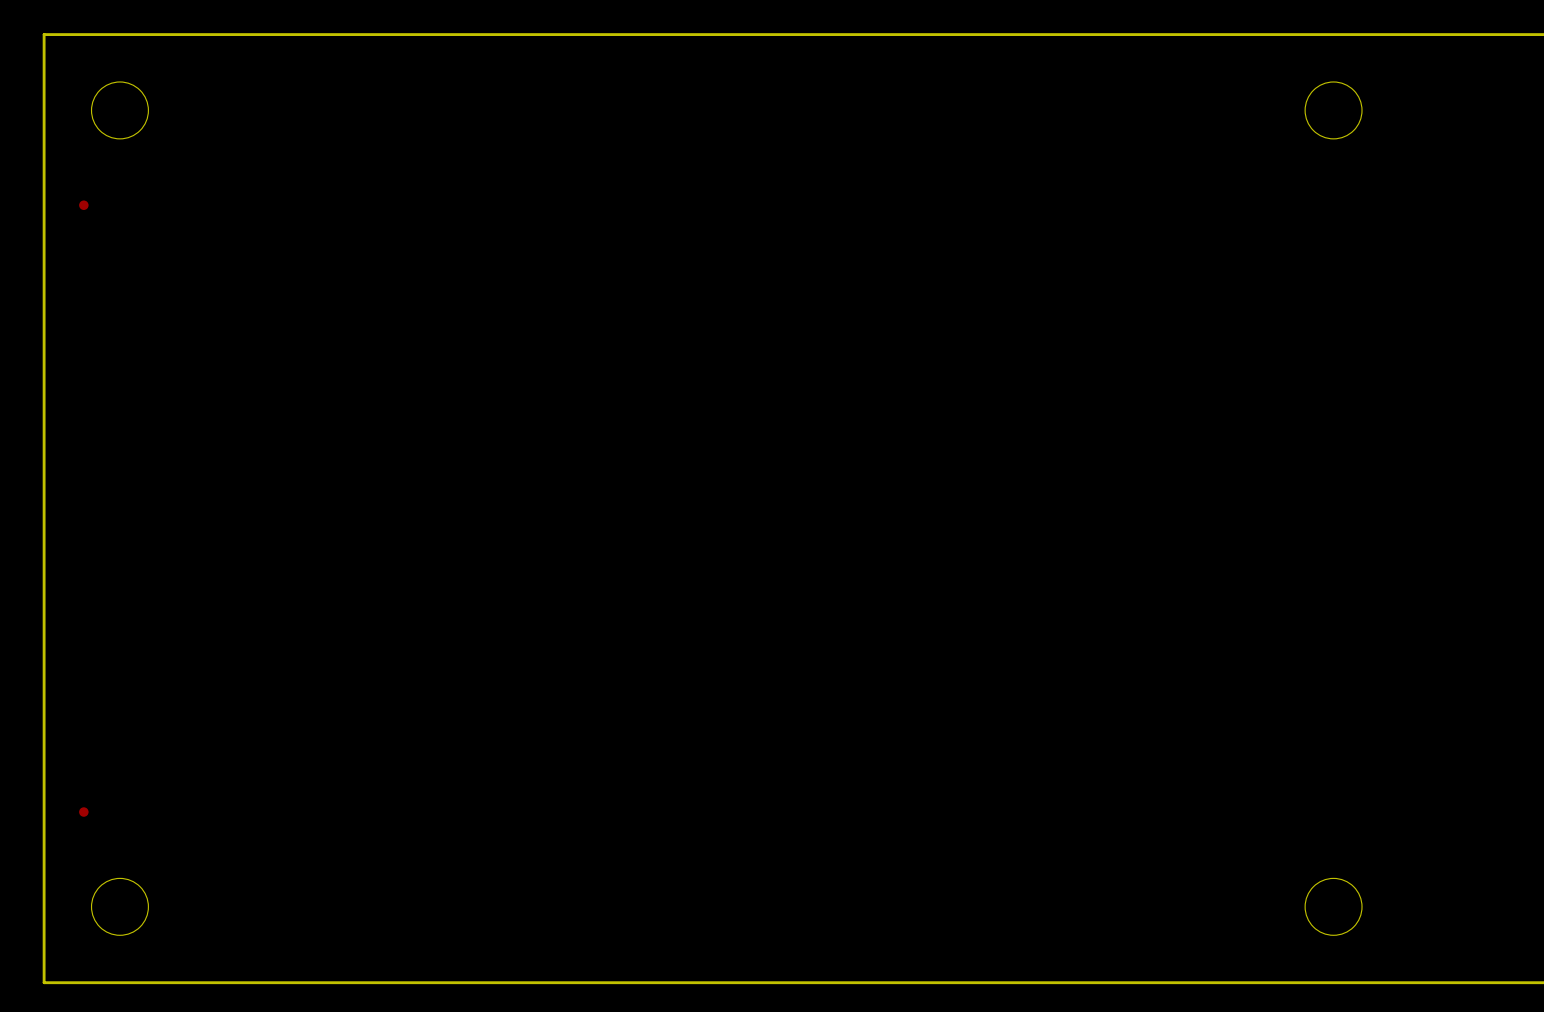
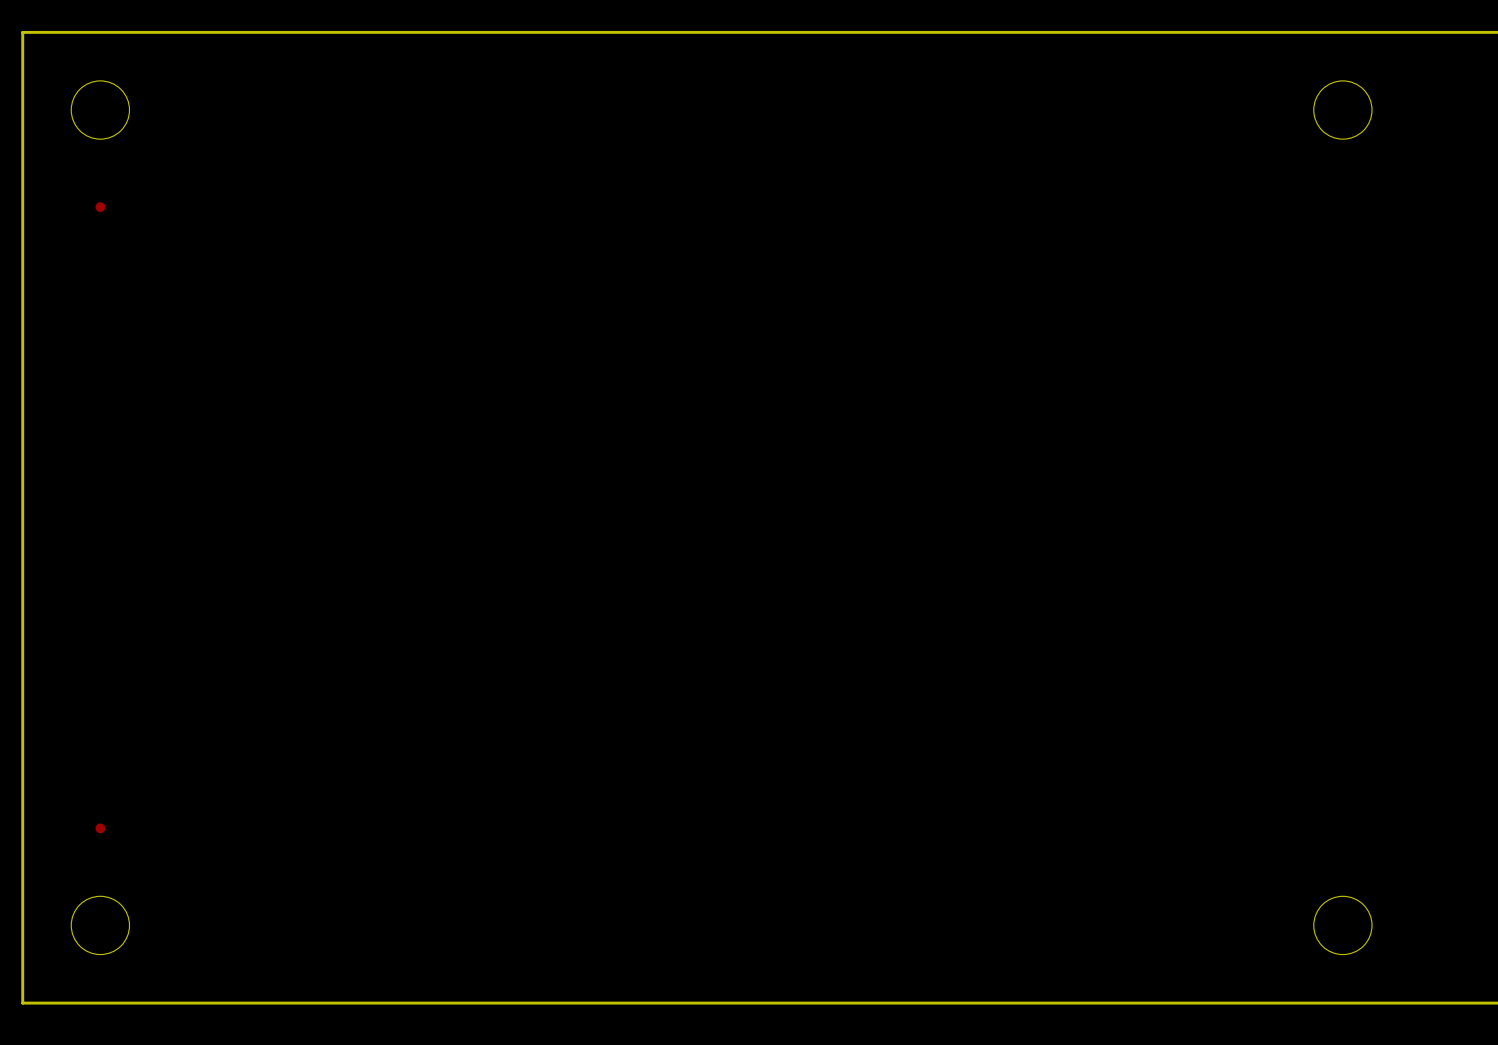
part position: (83, 205) -> (100, 207)
part position: (83, 812) -> (100, 828)

